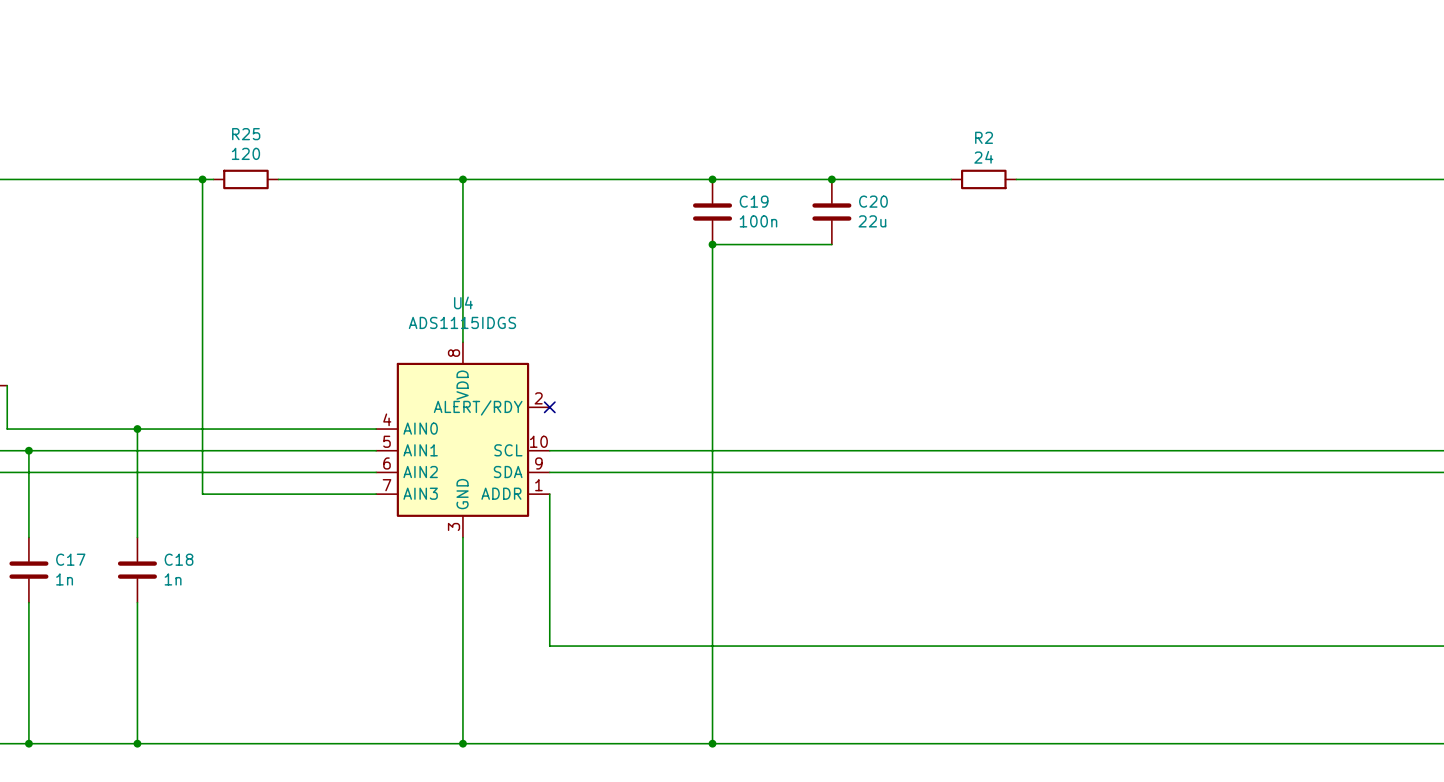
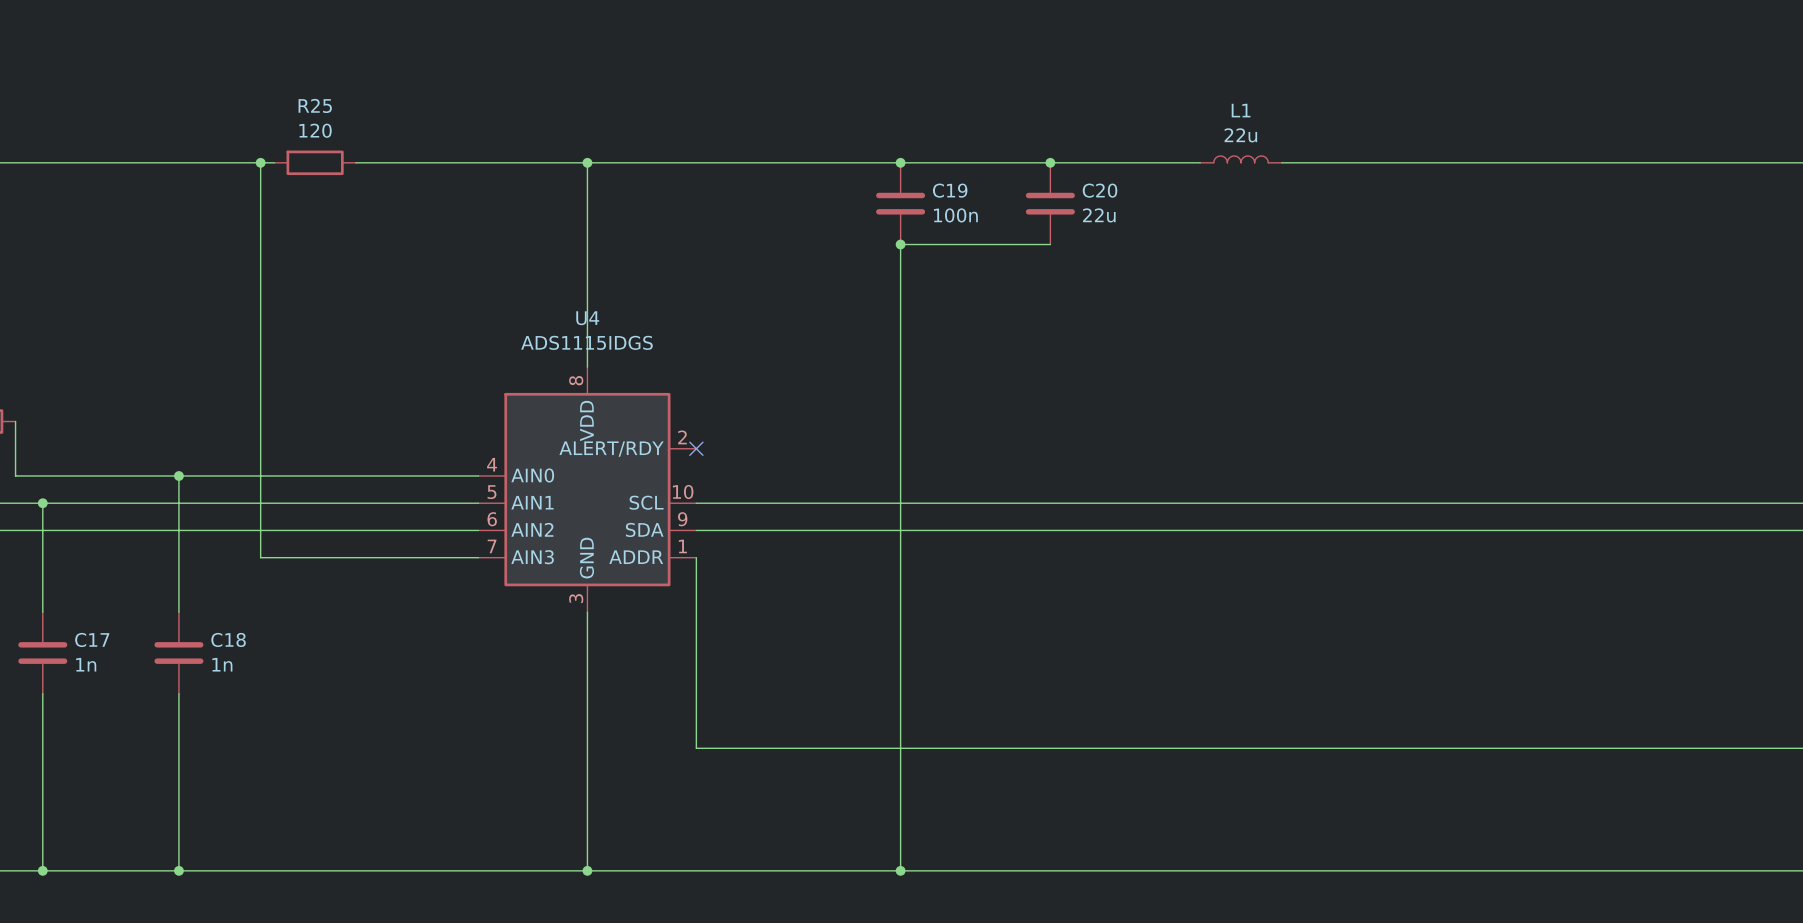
L1: none -> 22u (1241, 159)
R2: 24 (983, 179) -> none

